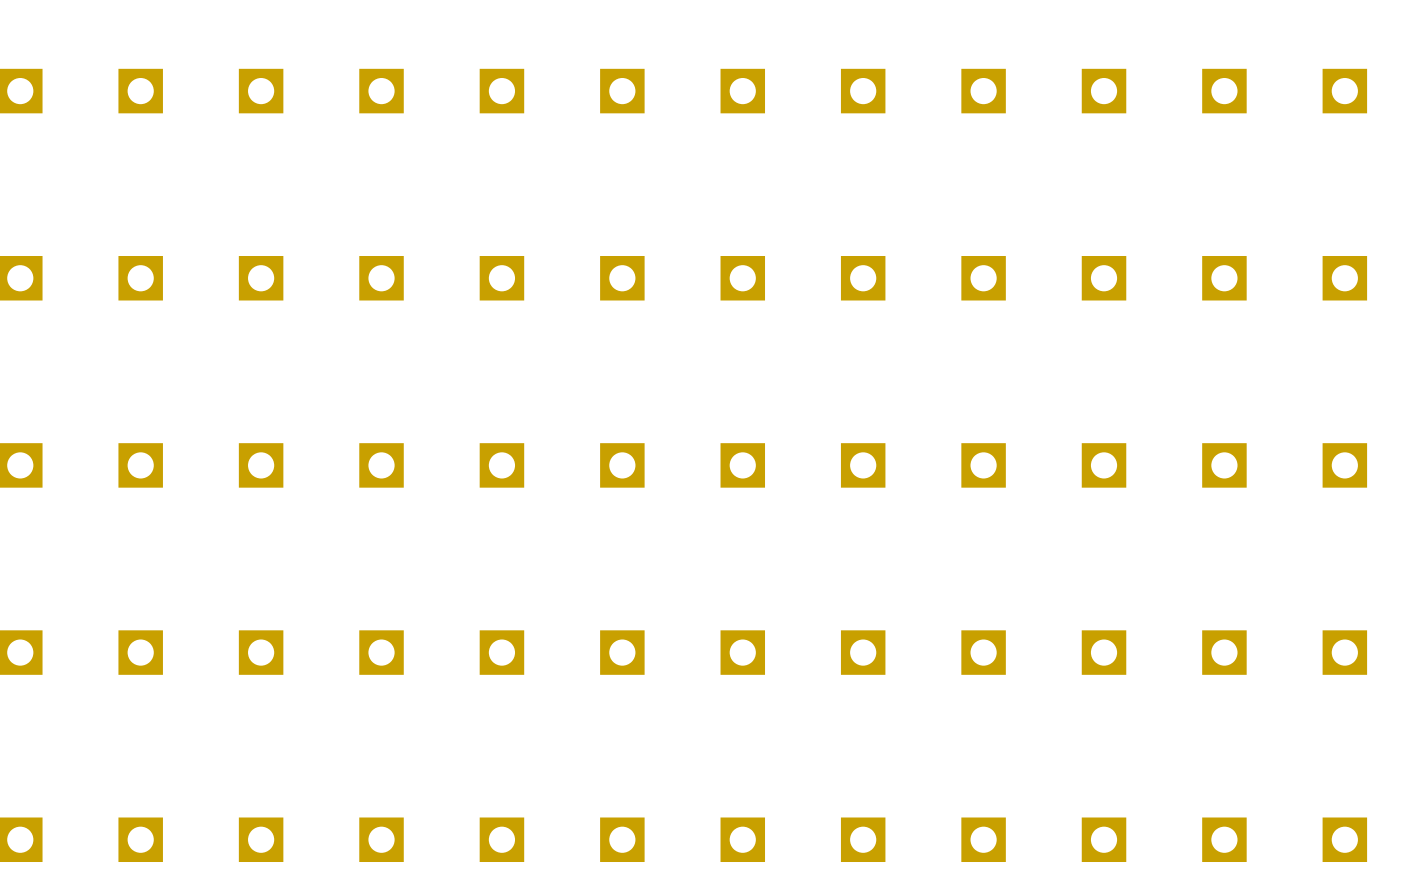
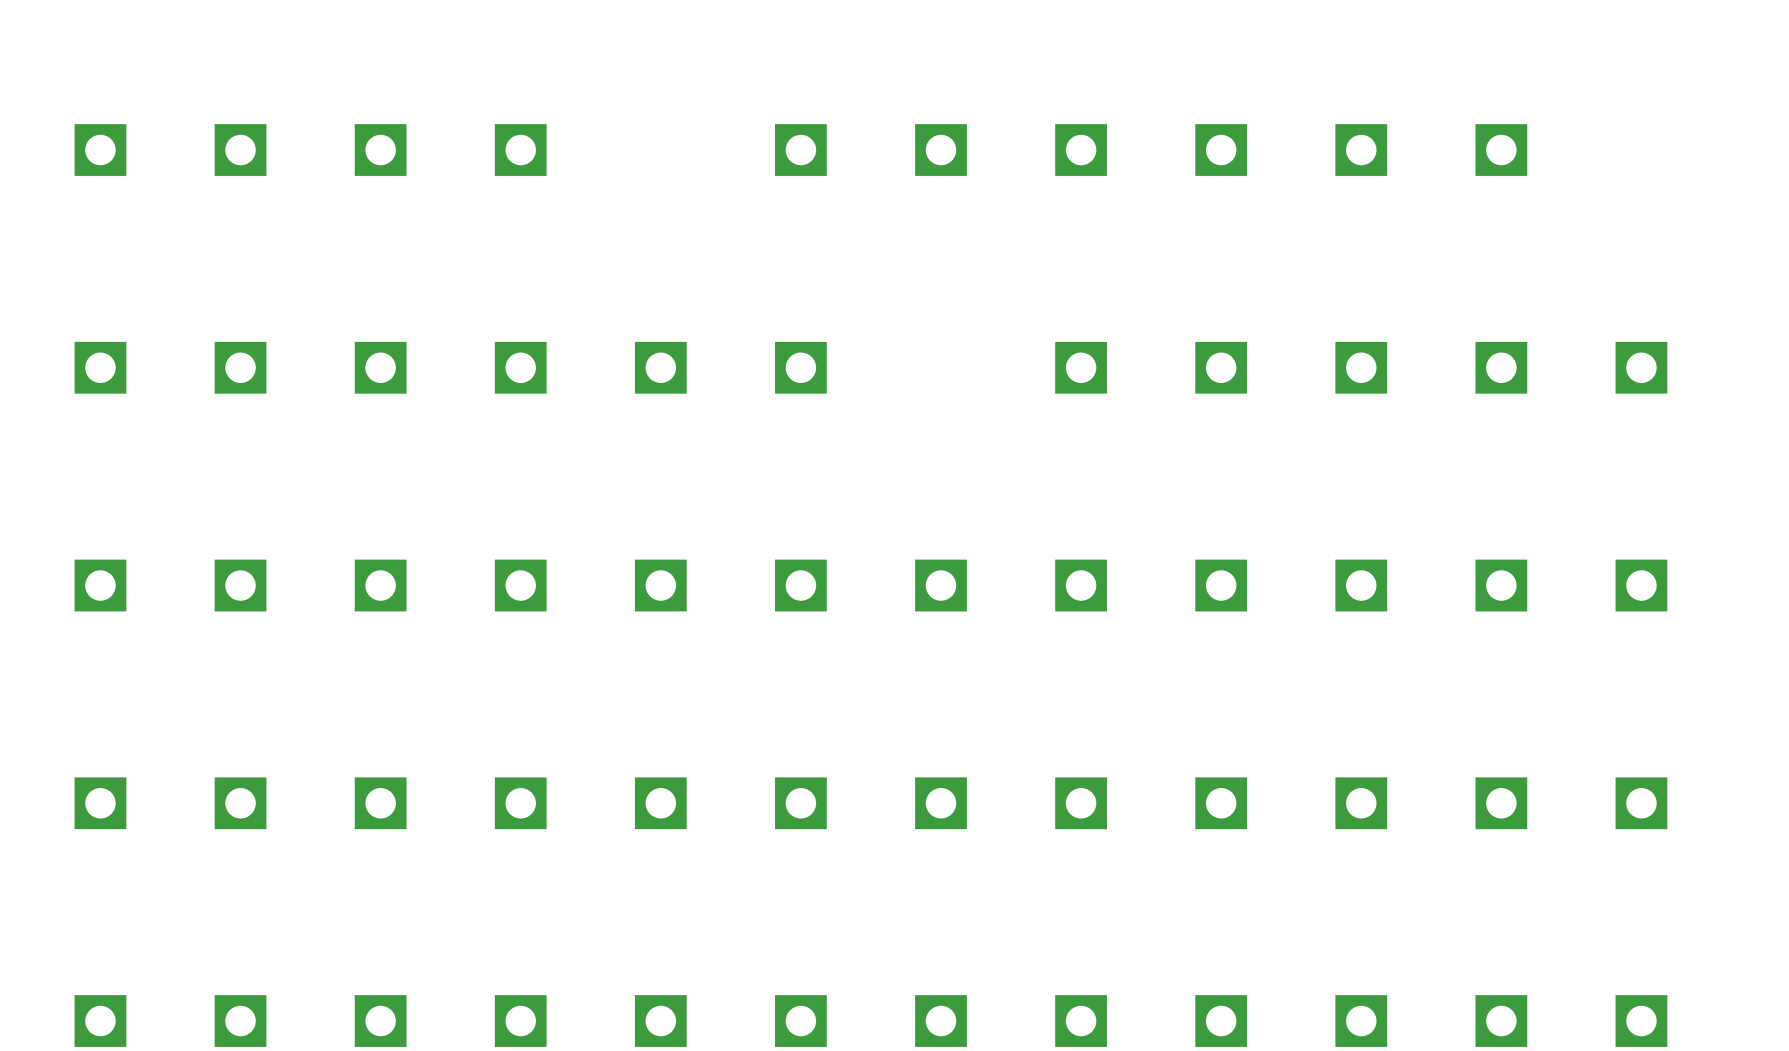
part: (501, 91) -> none
part: (1344, 91) -> none
part: (742, 278) -> none

